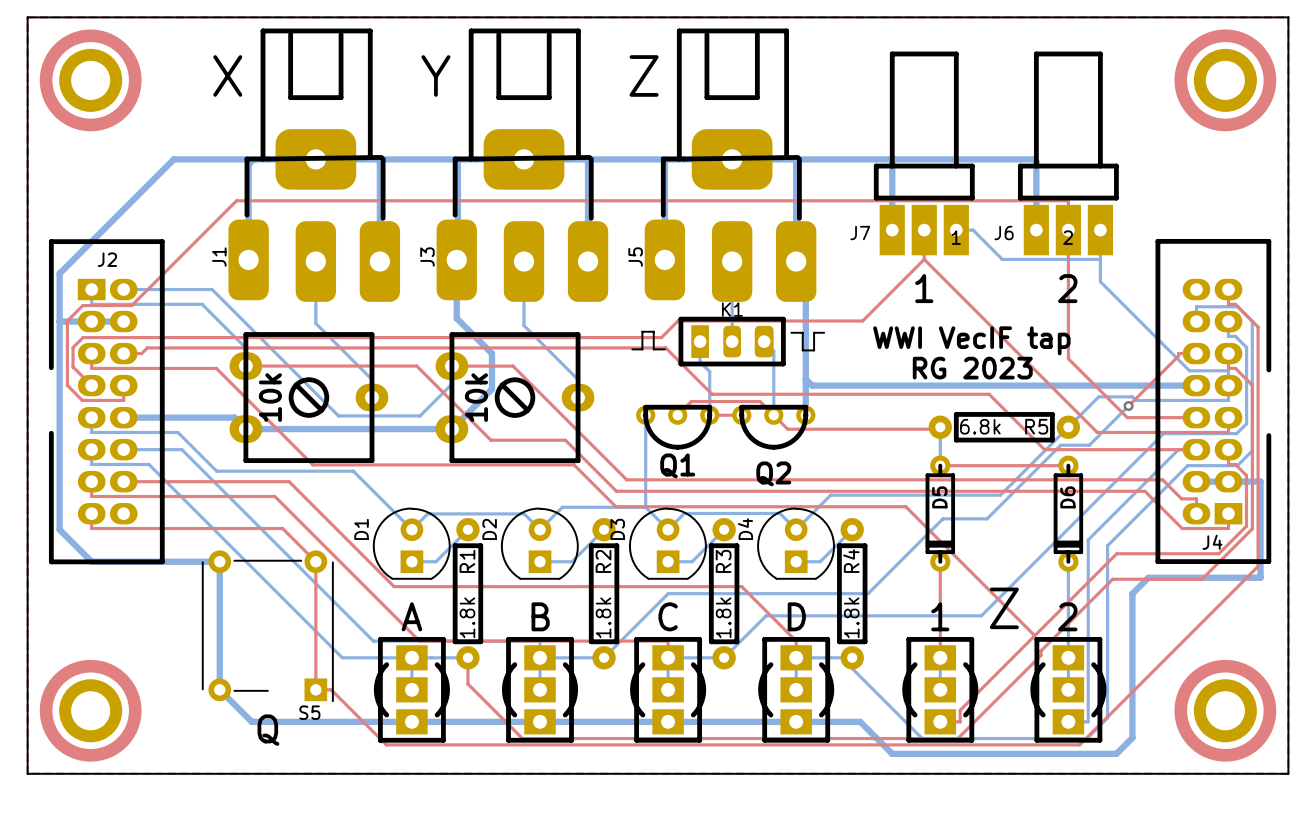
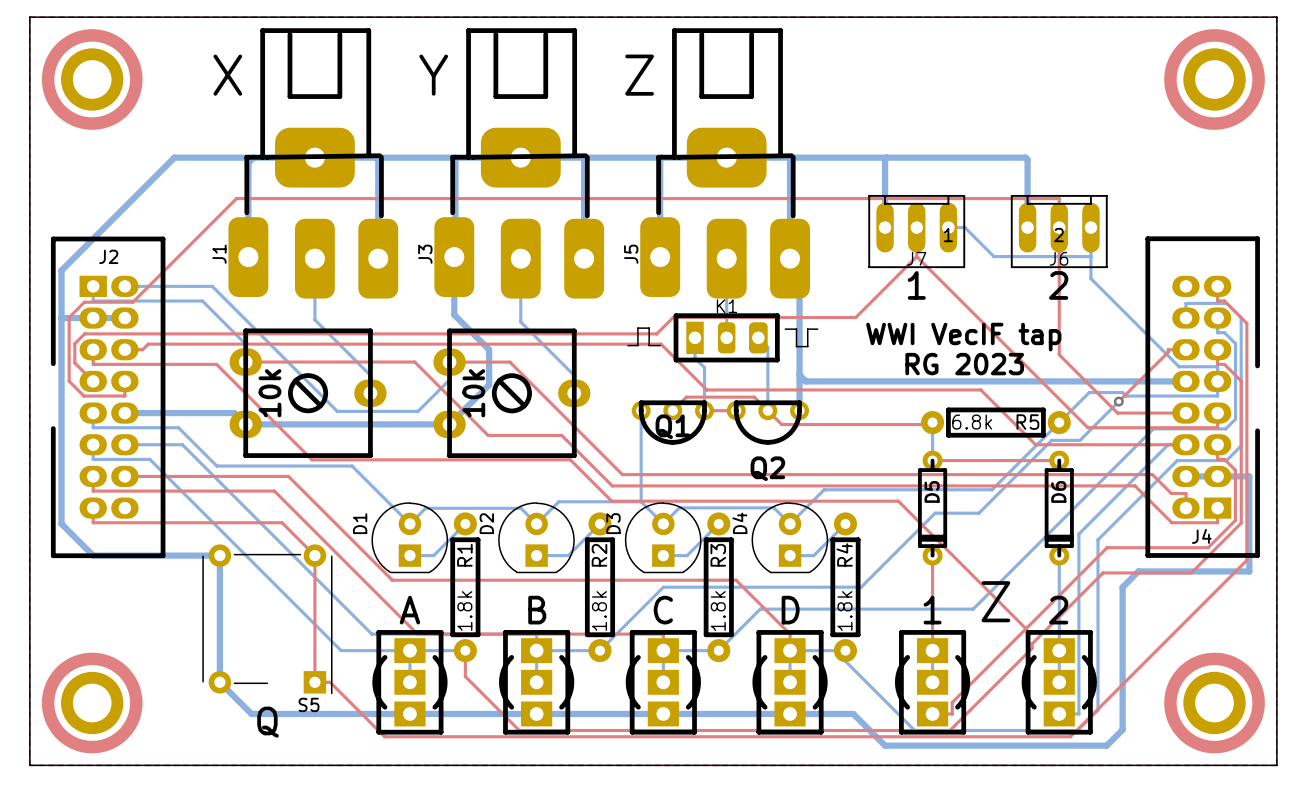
J7 footprint: [873, 51, 975, 256] -> [868, 194, 966, 269]
J6 footprint: [1017, 51, 1119, 256] -> [1010, 194, 1108, 269]
J7 name position: J7 (860, 233) -> J7 (916, 258)
J6 name position: J6 (1004, 233) -> J6 (1058, 258)
Q1 name position: Q1 (677, 465) -> Q1 (672, 426)

